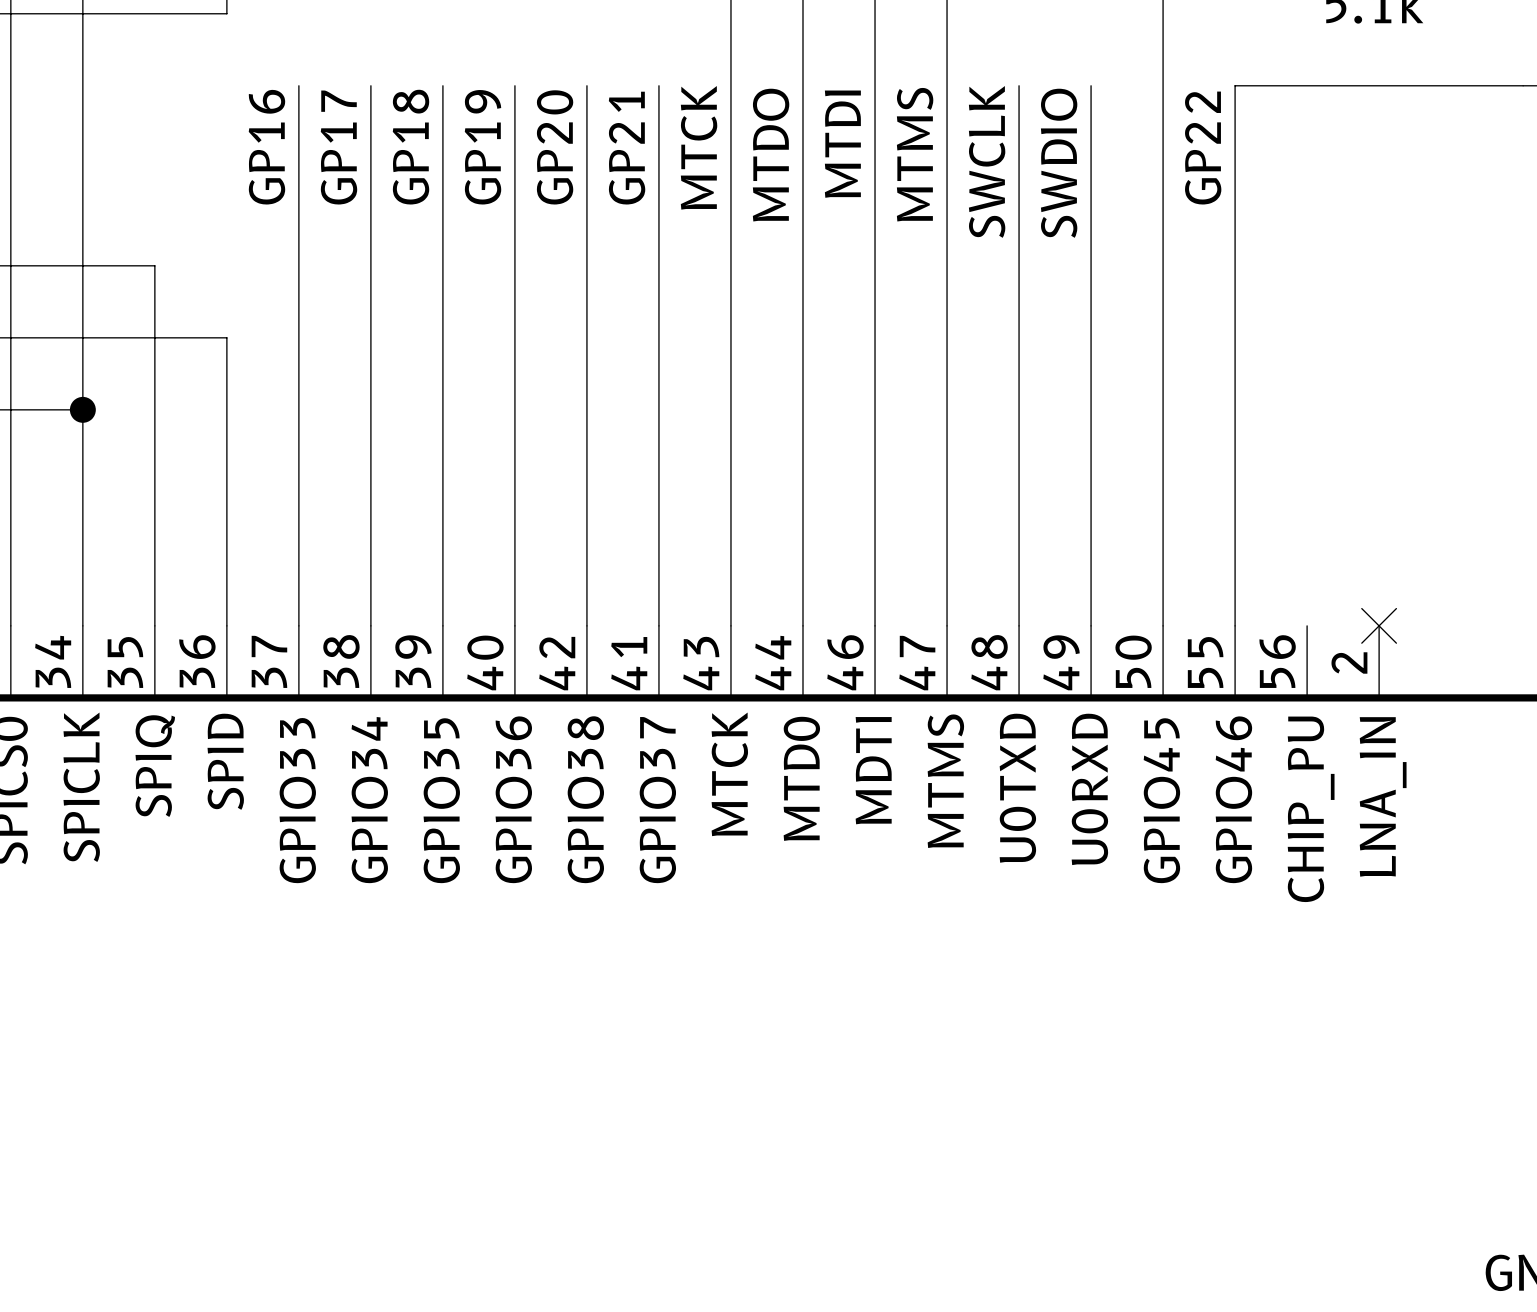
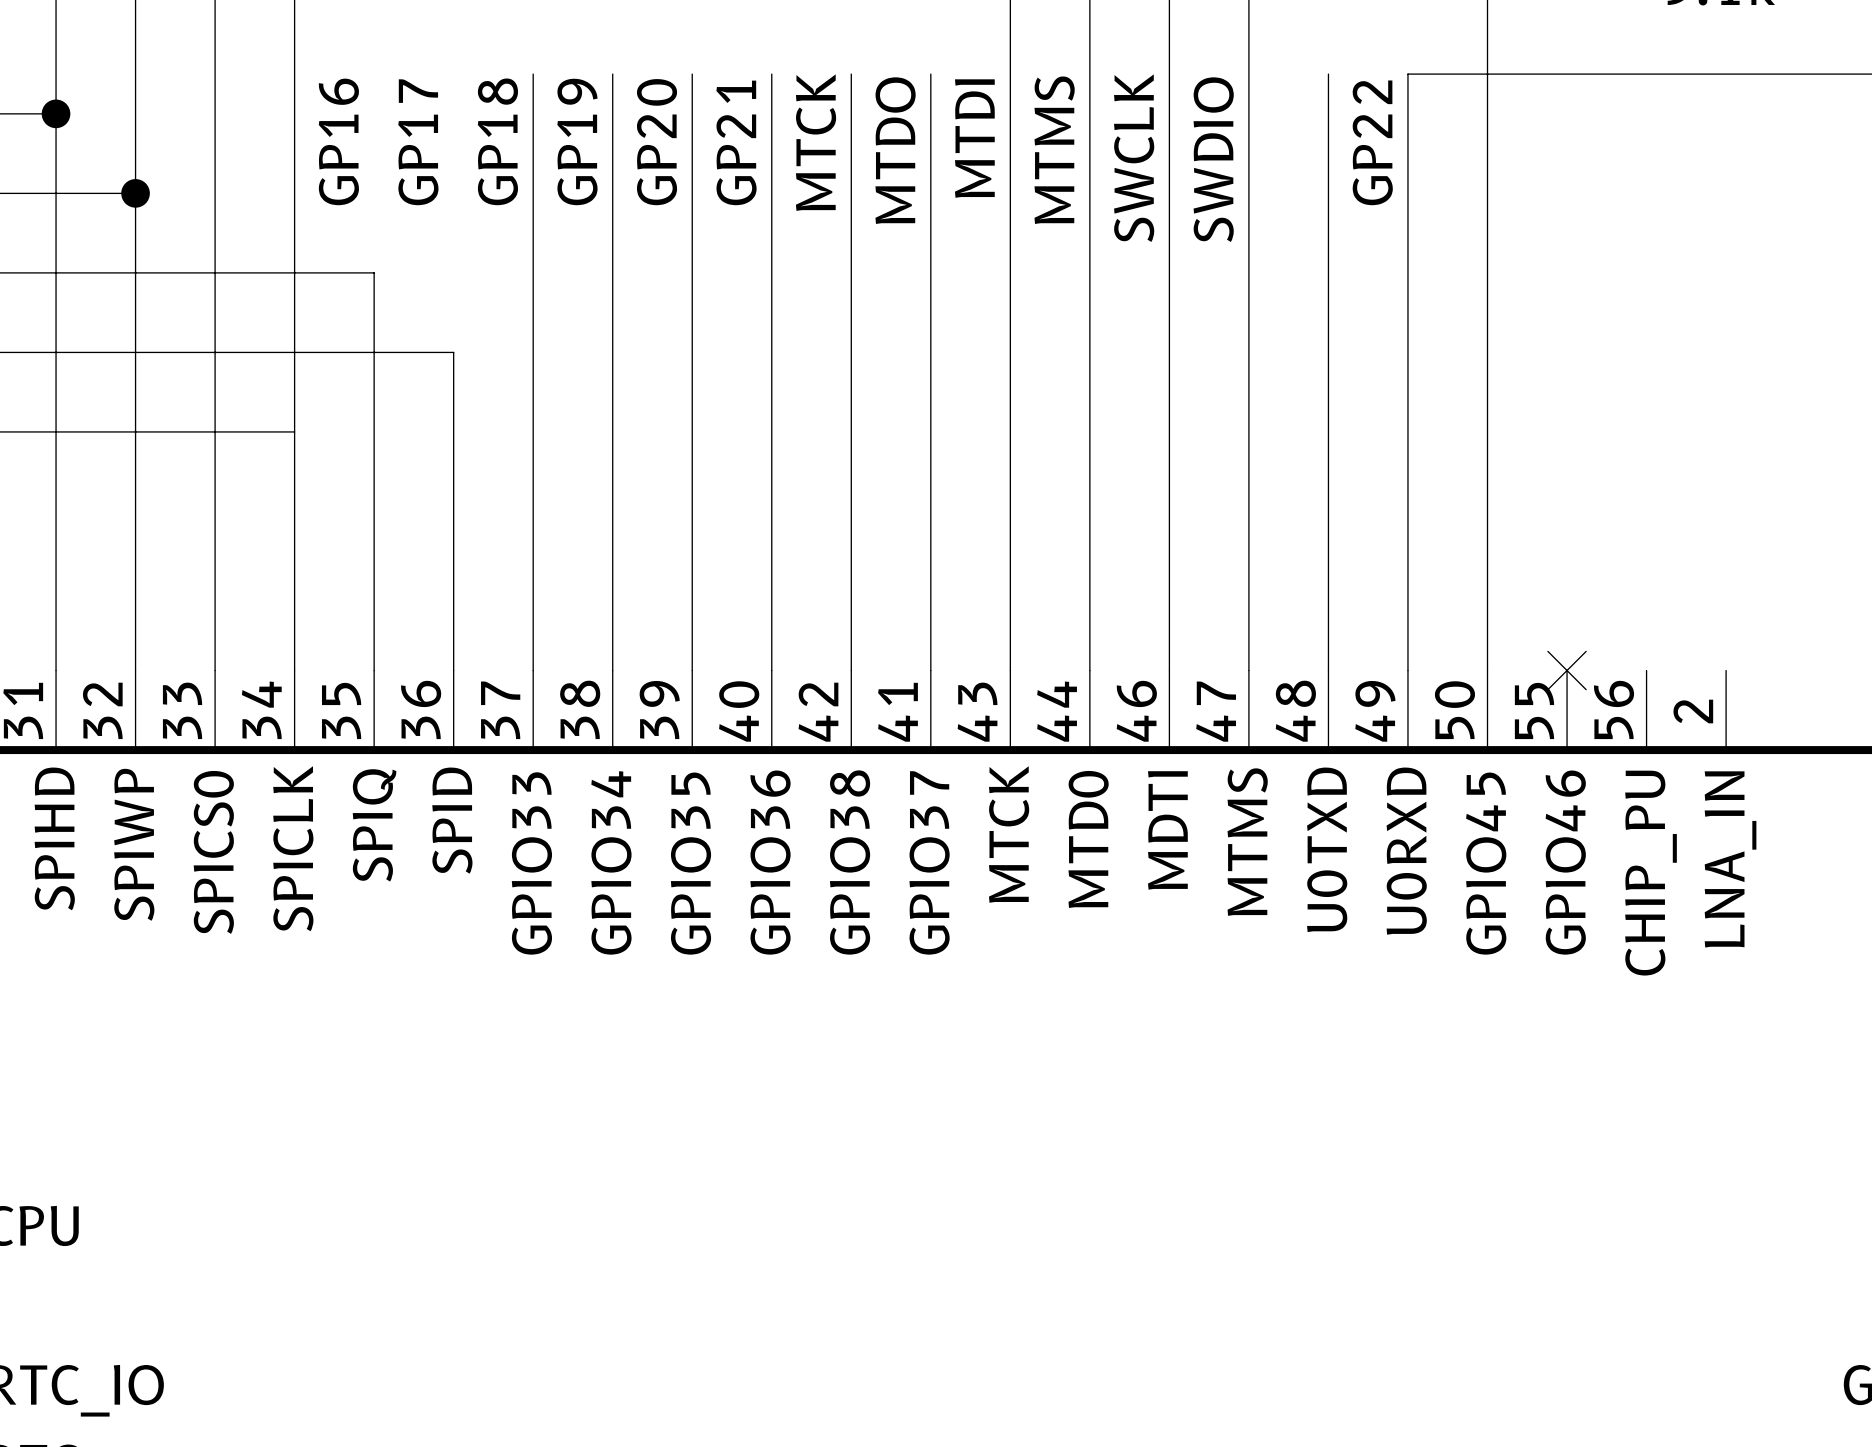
wire: (1235, 85) (1235, 625) -> (1567, 74) (1407, 74)
label: MTDI (842, 144) -> SWCLK (1134, 158)
label: none -> GP16 (338, 141)
label: none -> GP17 (418, 142)
label: GP16 (266, 147) -> GP18 (497, 141)
label: GP17 (338, 147) -> GP19 (577, 141)
label: GP18 (411, 147) -> GP20 (657, 142)
label: GP19 (483, 147) -> GP21 (736, 142)
label: GP20 (555, 147) -> MTCK (816, 142)
label: MTCK (699, 147) -> MTDI (974, 138)
label: GP21 (627, 148) -> MTDO (895, 150)
label: GP22 (1203, 148) -> none
label: MTMS (915, 154) -> SWDIO (1213, 159)
label: MTDO (771, 155) -> MTMS (1054, 150)
label: SWCLK (987, 161) -> none
label: SWDIO (1059, 163) -> GP22 (1372, 142)
junction: (82, 409) -> none
no-connect mark position: (1379, 625) -> (1567, 670)

